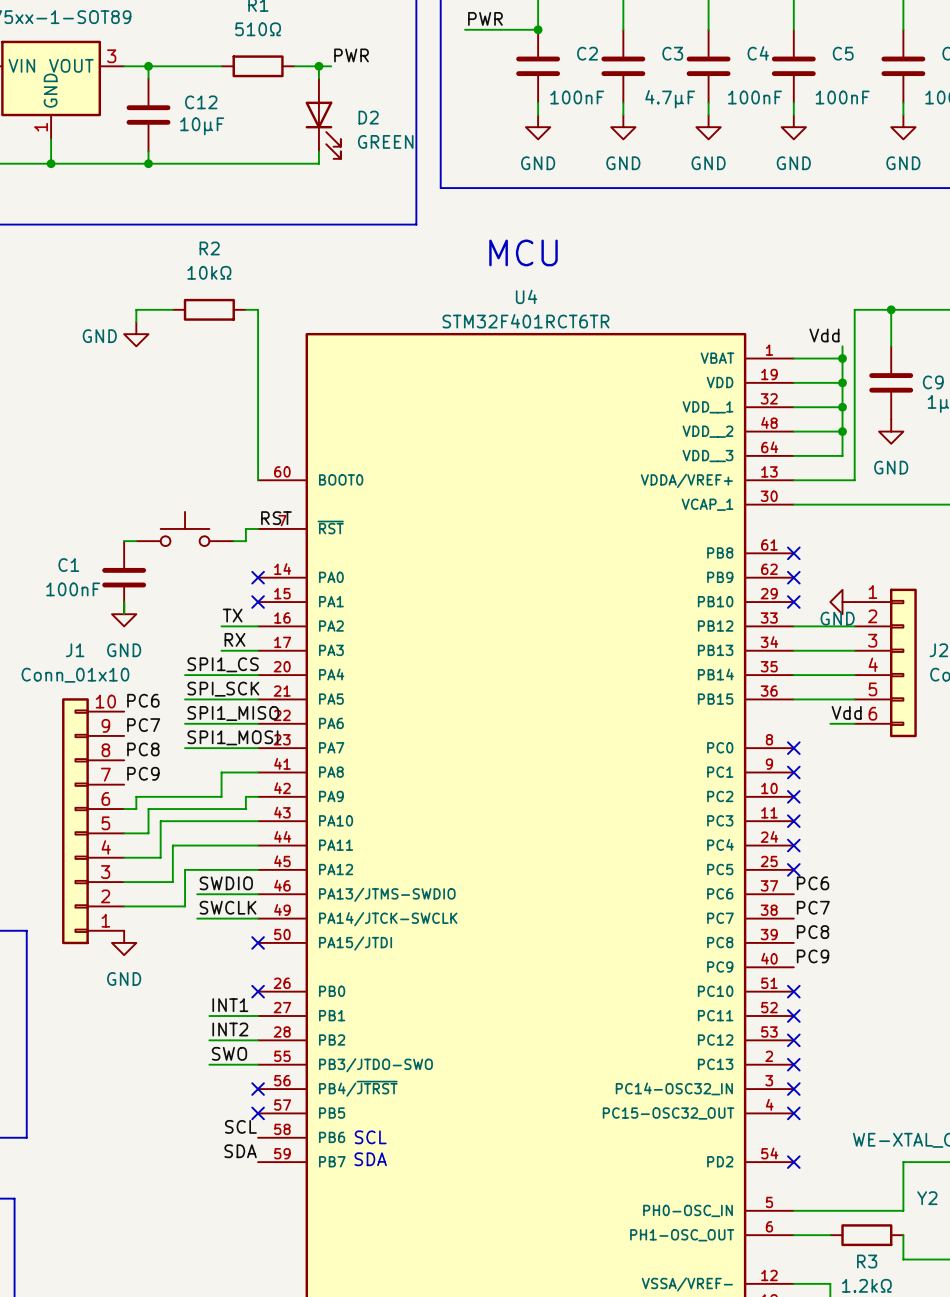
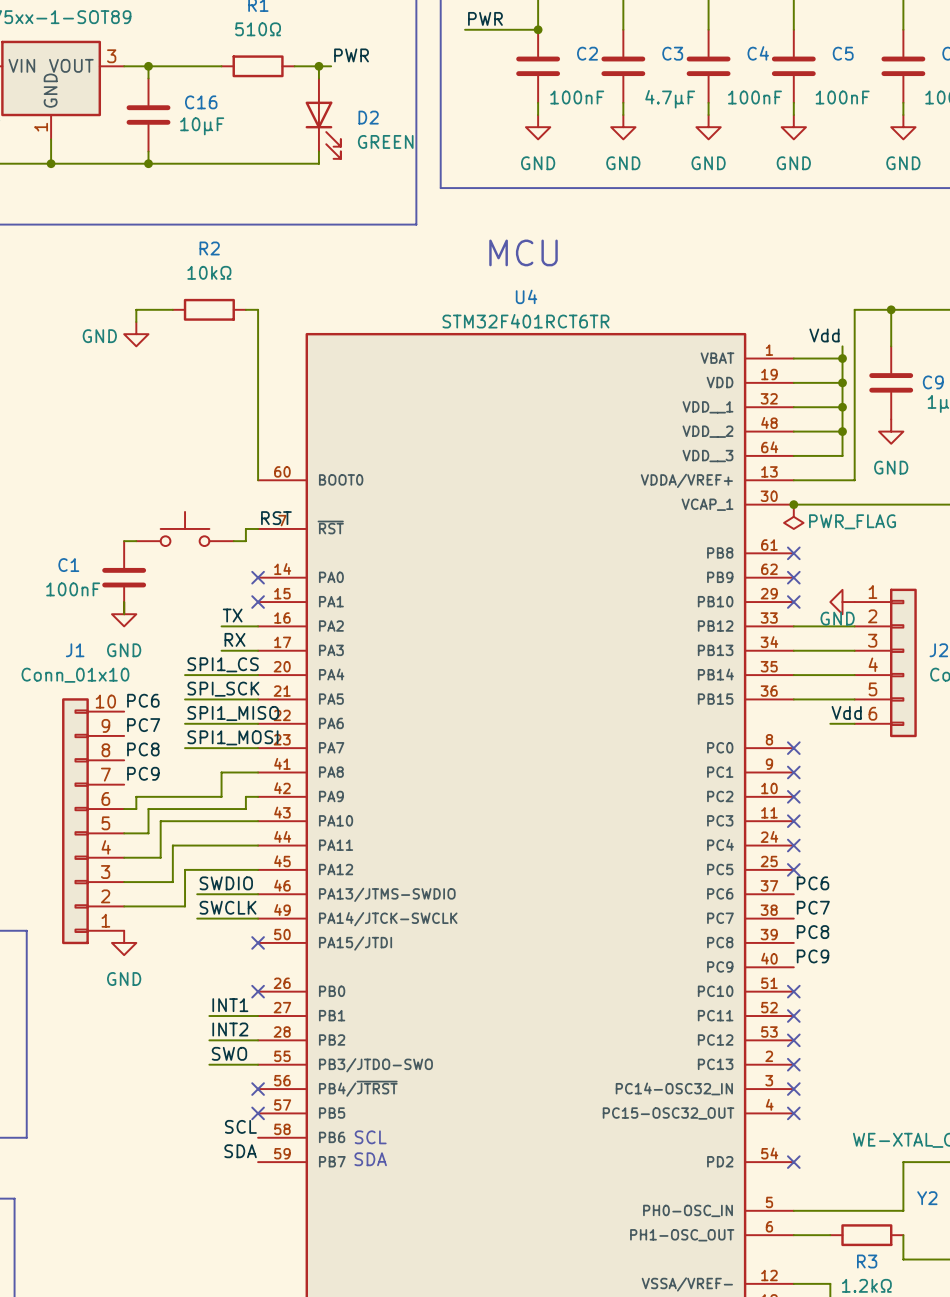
C12 name: C12 (201, 102) -> C16 (201, 102)
junction: none -> (793, 504)
power symbol: none -> PWR_FLAG (793, 516)

